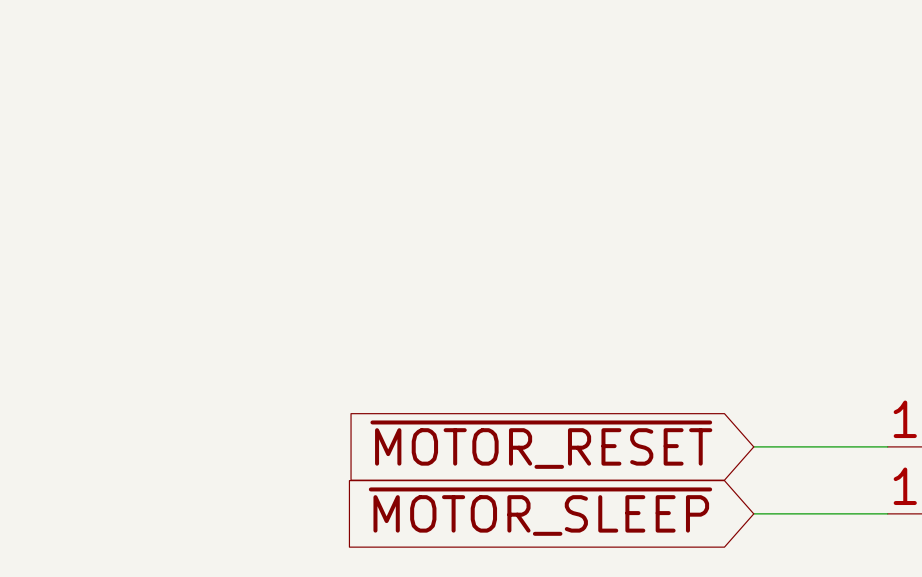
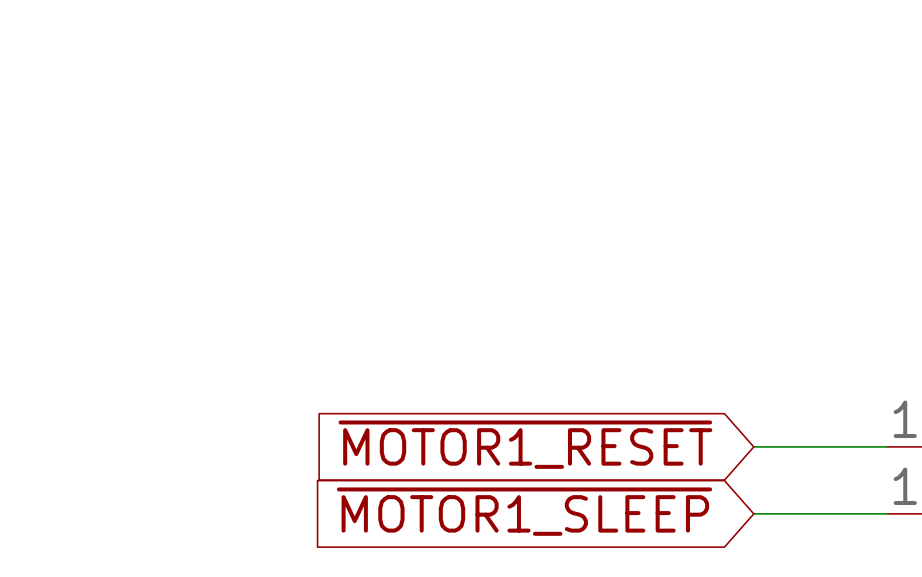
global label: ~{MOTOR_RESET} (541, 444) -> ~{MOTOR1_RESET} (525, 444)
global label: ~{MOTOR_SLEEP} (540, 511) -> ~{MOTOR1_SLEEP} (524, 511)

